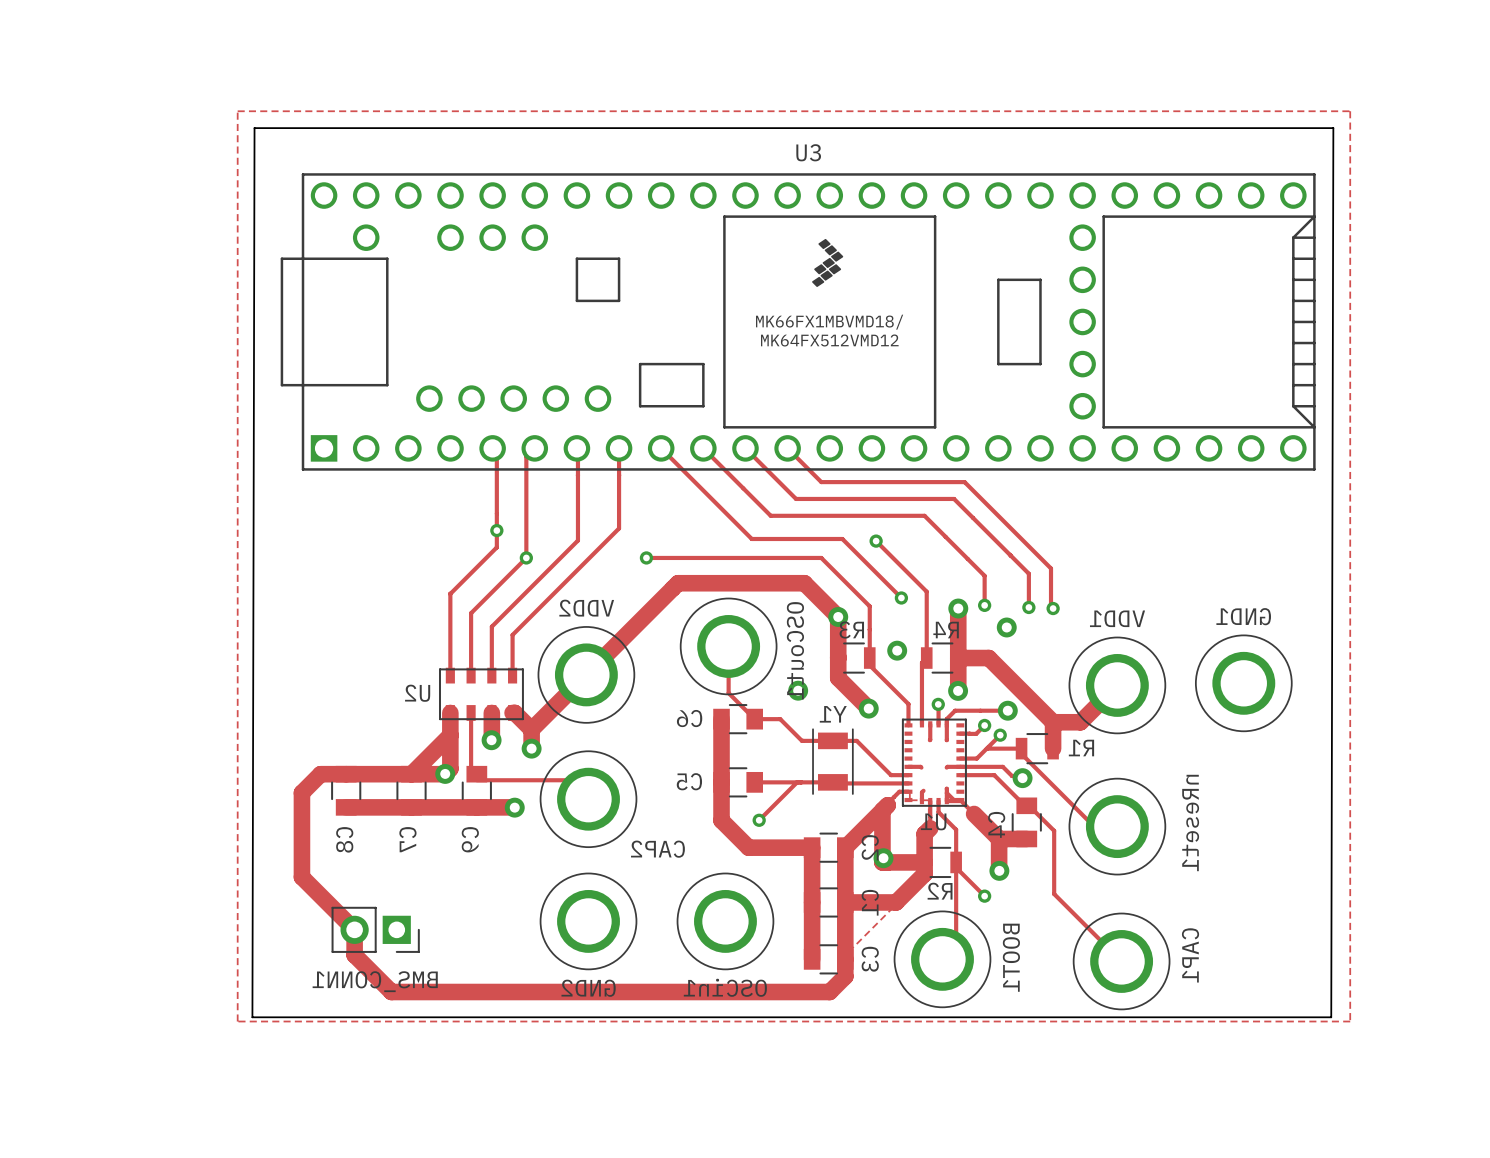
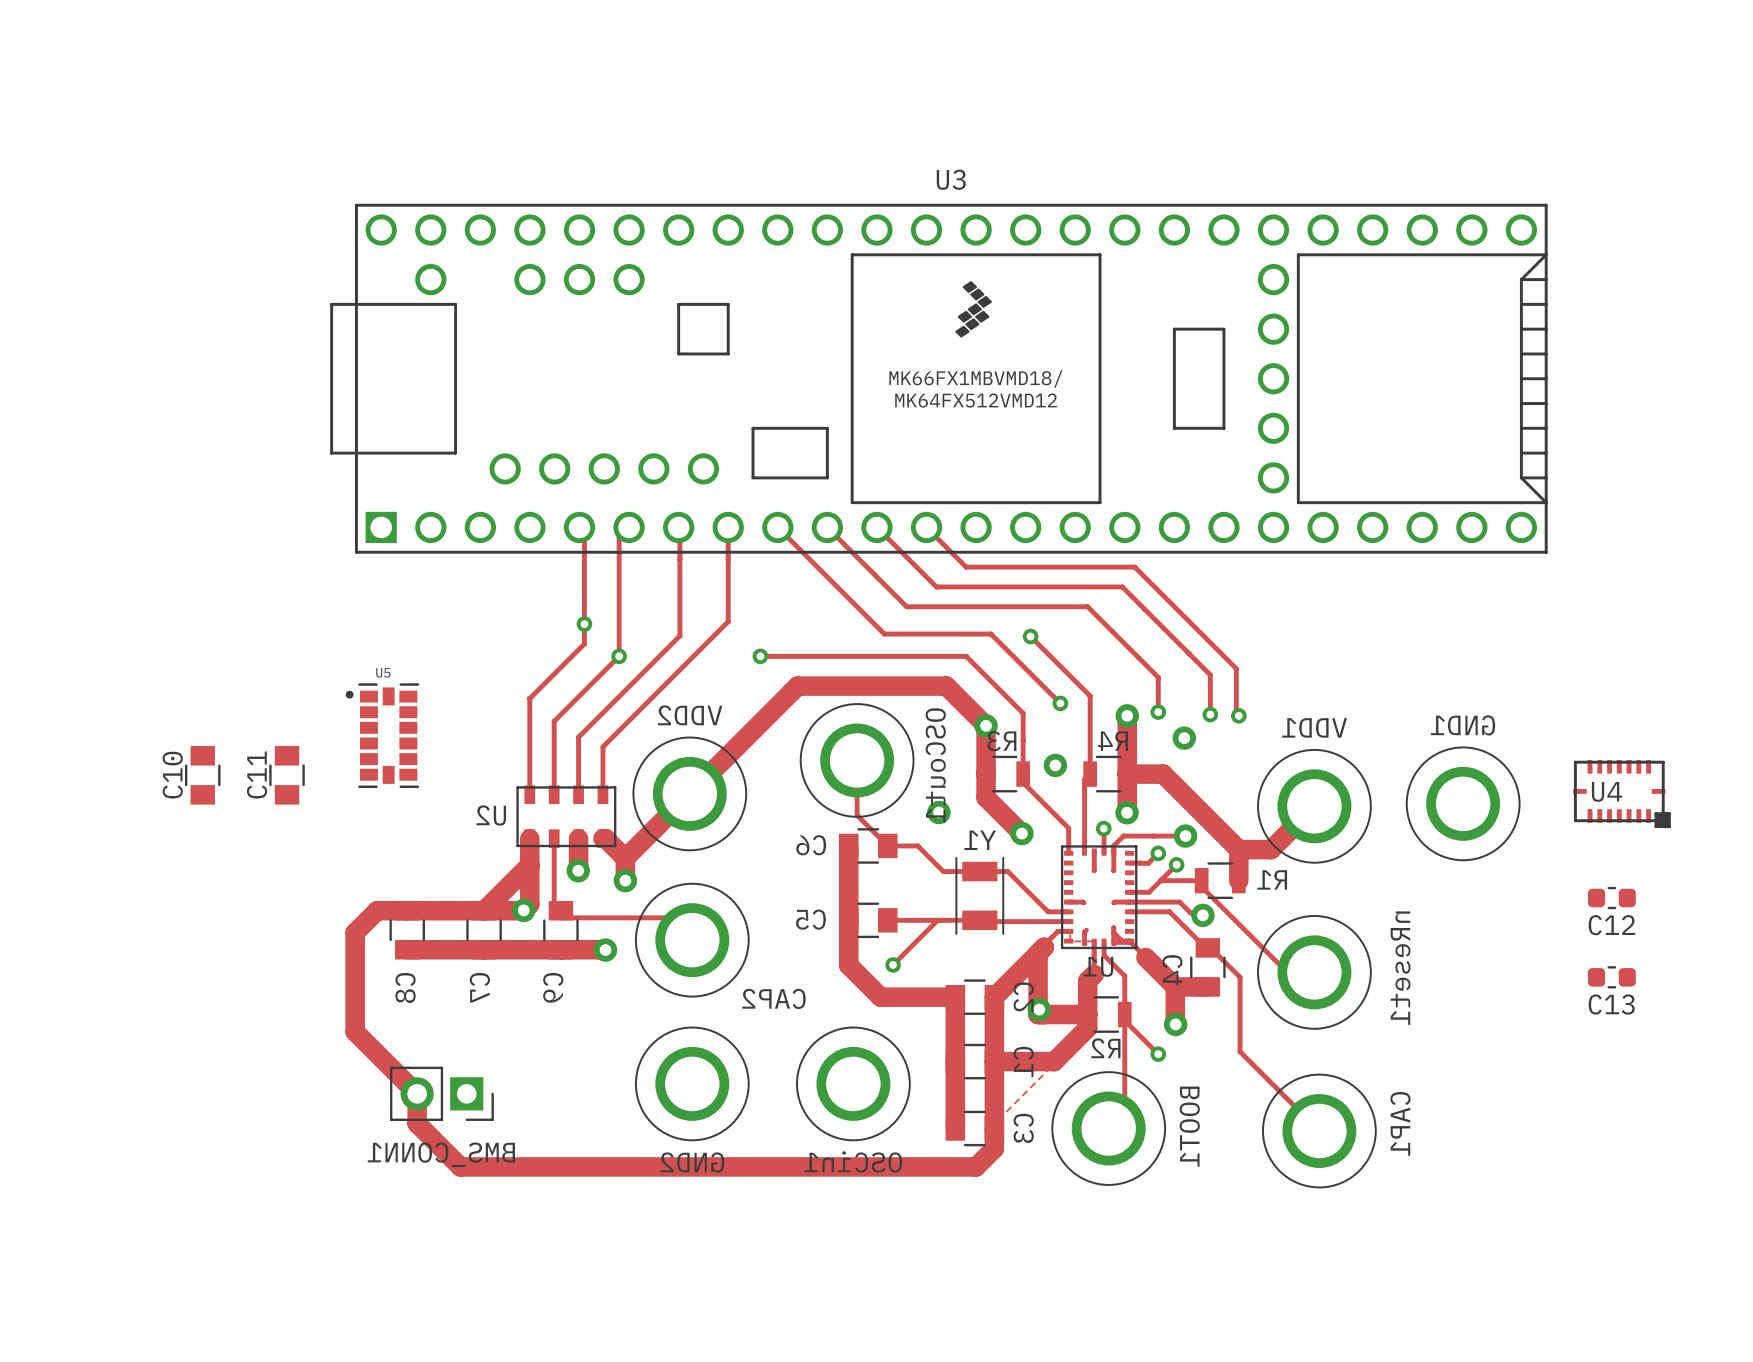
zone outline: (237, 111) (1350, 111) (1350, 1021) (237, 1021) (237, 111) -> none
board edge: (254, 128) (252, 1017) (1331, 1017) (1333, 128) (254, 128) -> none
U5: none -> (382, 735)
C10: none -> (202, 775)
C11: none -> (287, 775)
U4: none -> (1621, 794)
C12: none -> (1611, 898)
C13: none -> (1611, 977)

